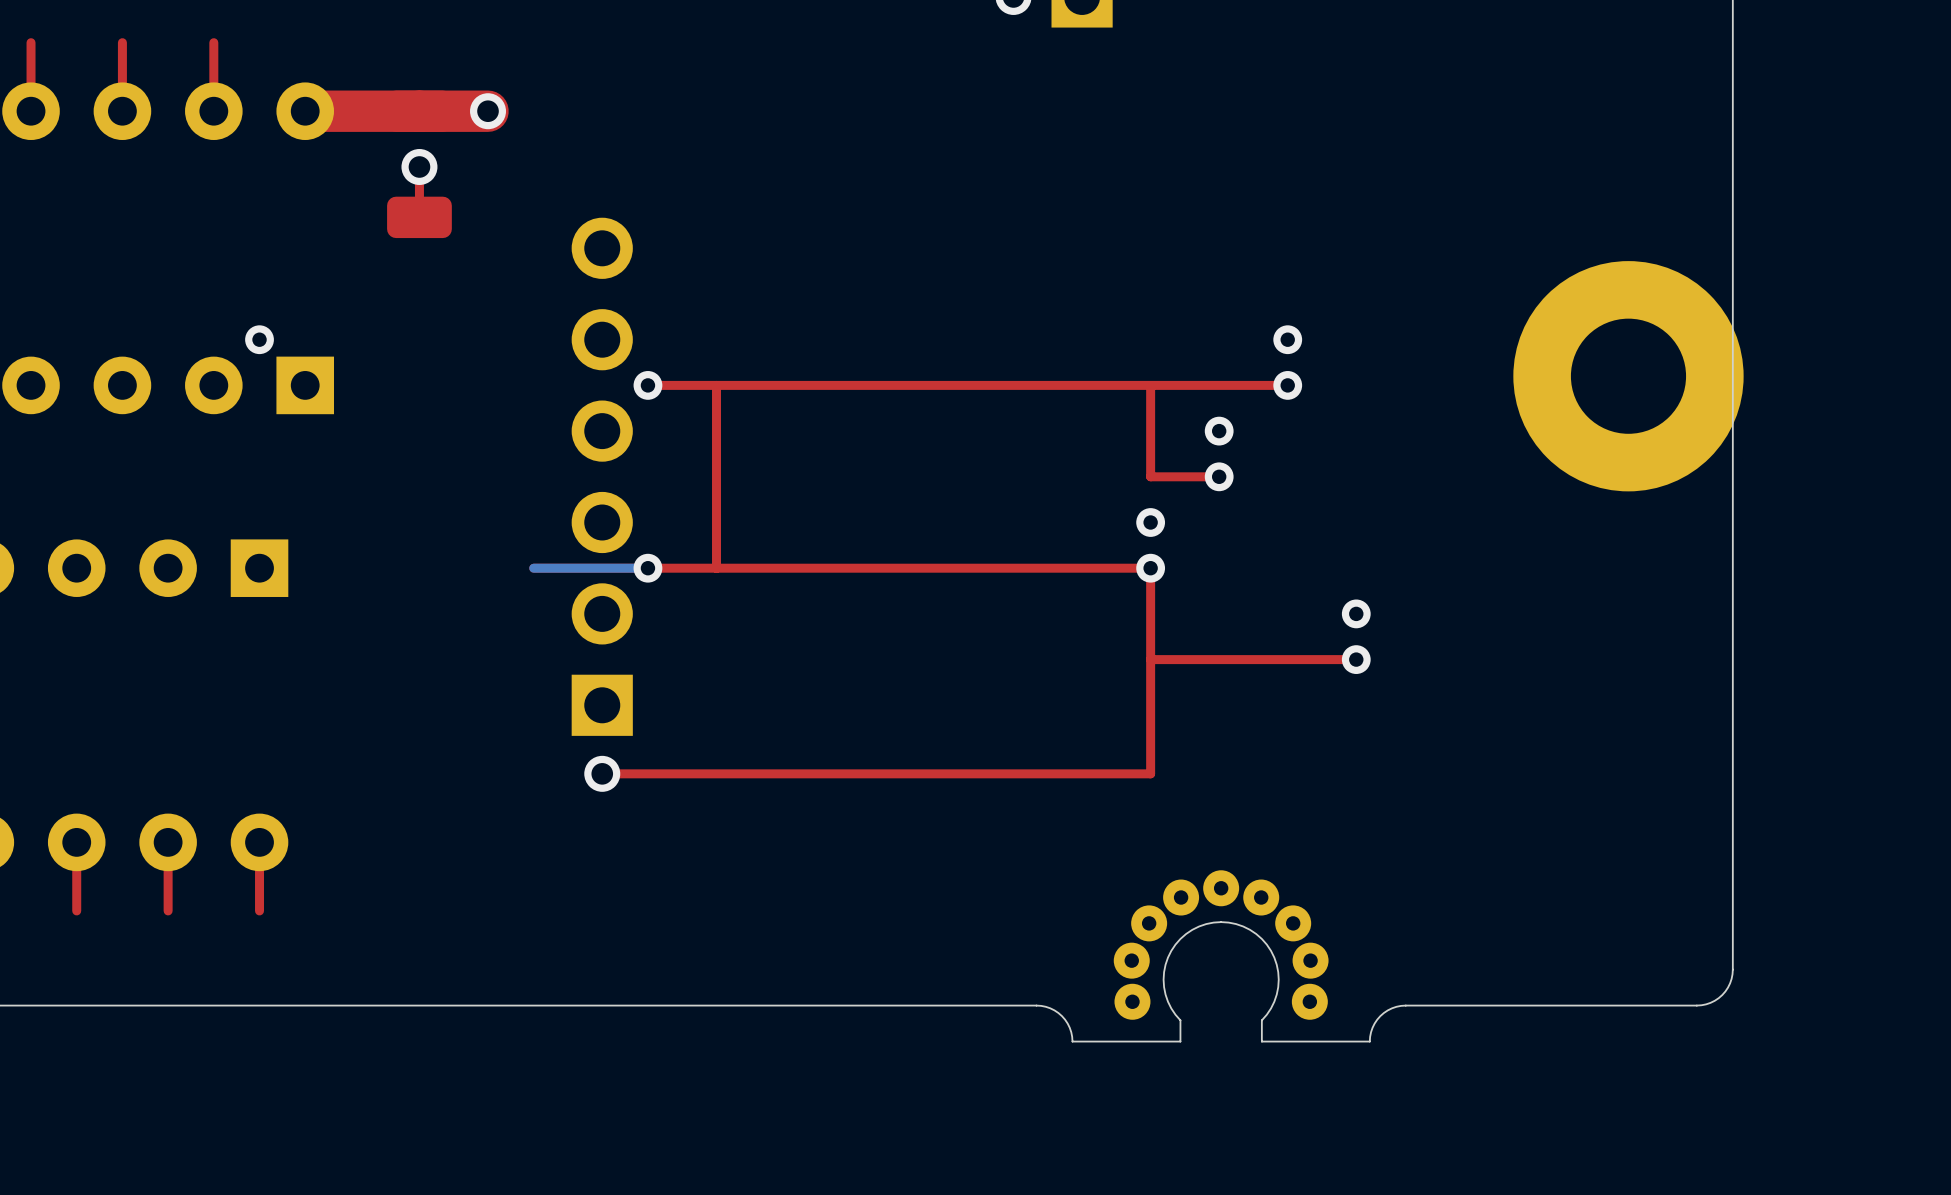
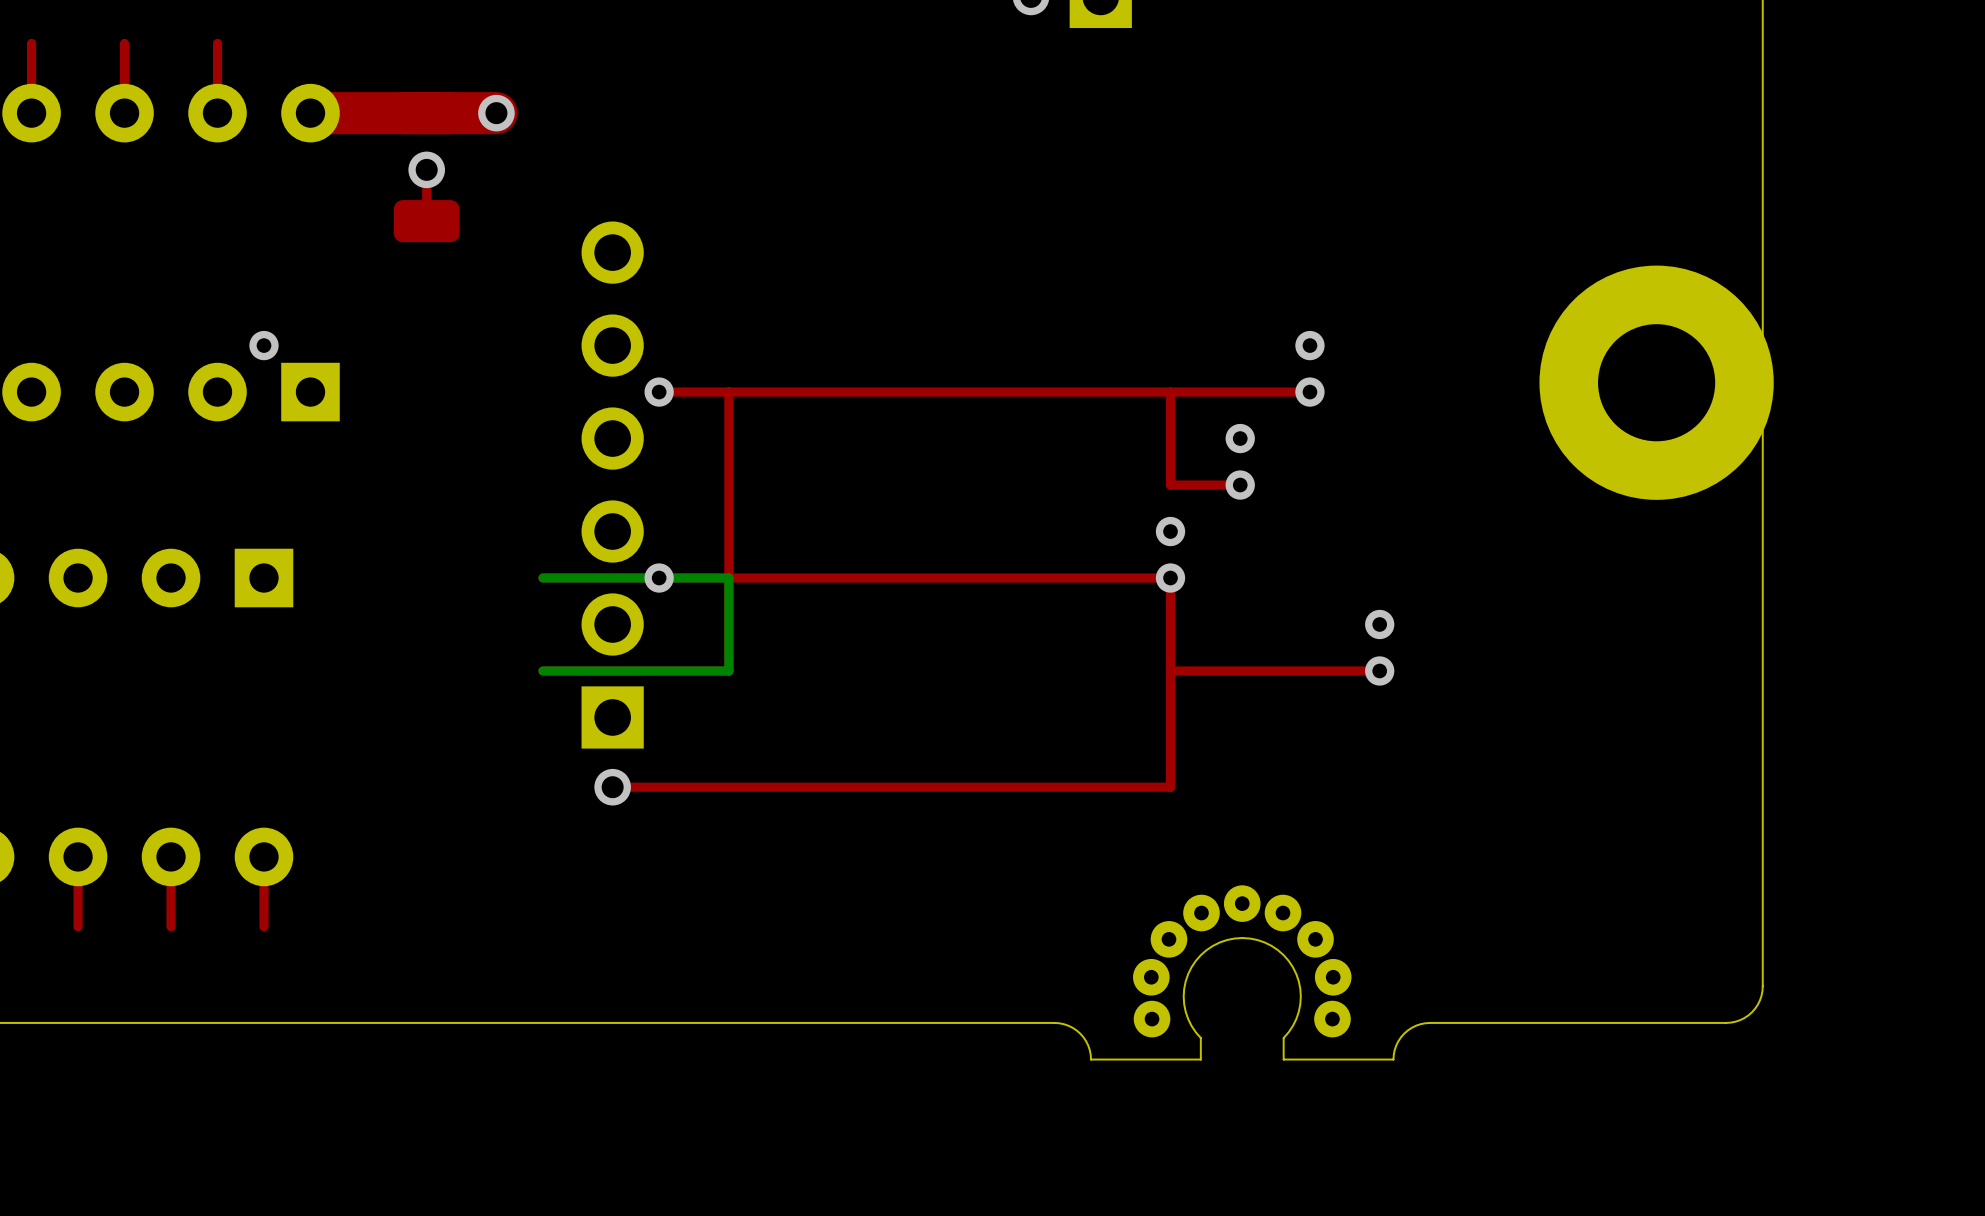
bottom track: none -> (659, 578) (728, 578) (728, 670) (542, 670)

